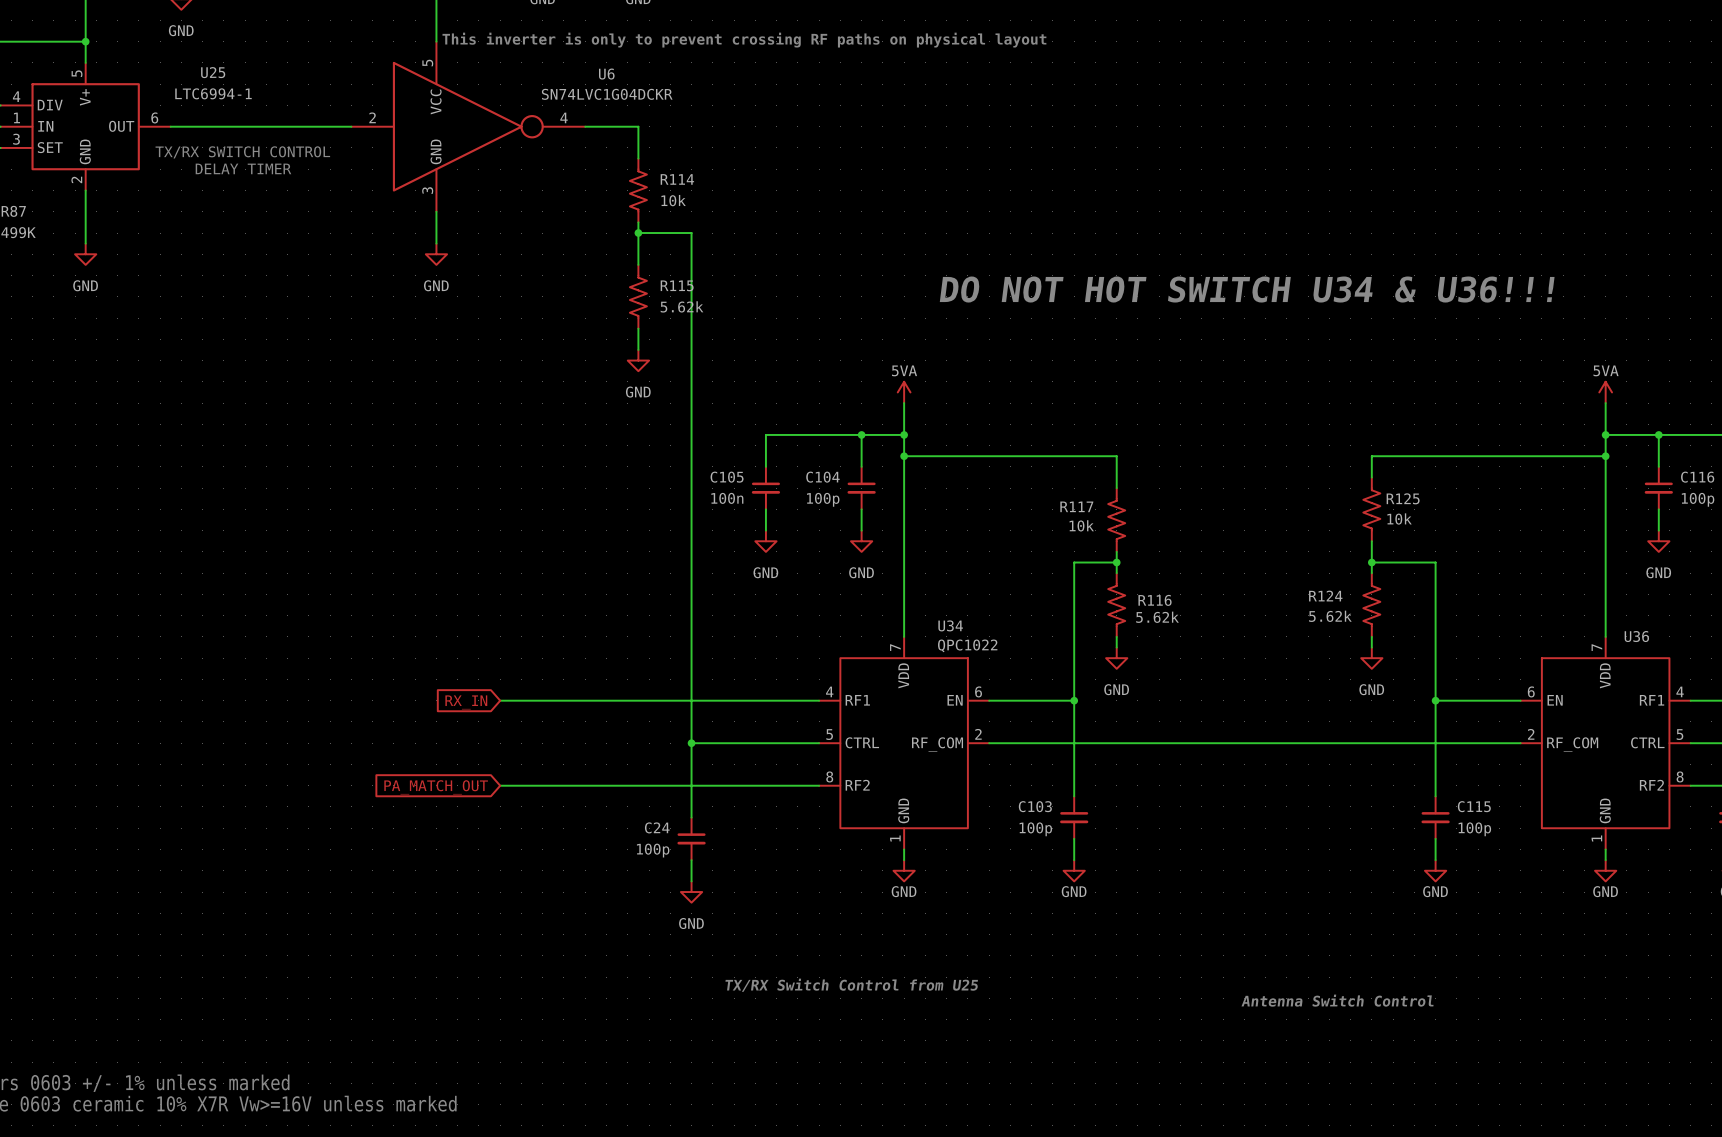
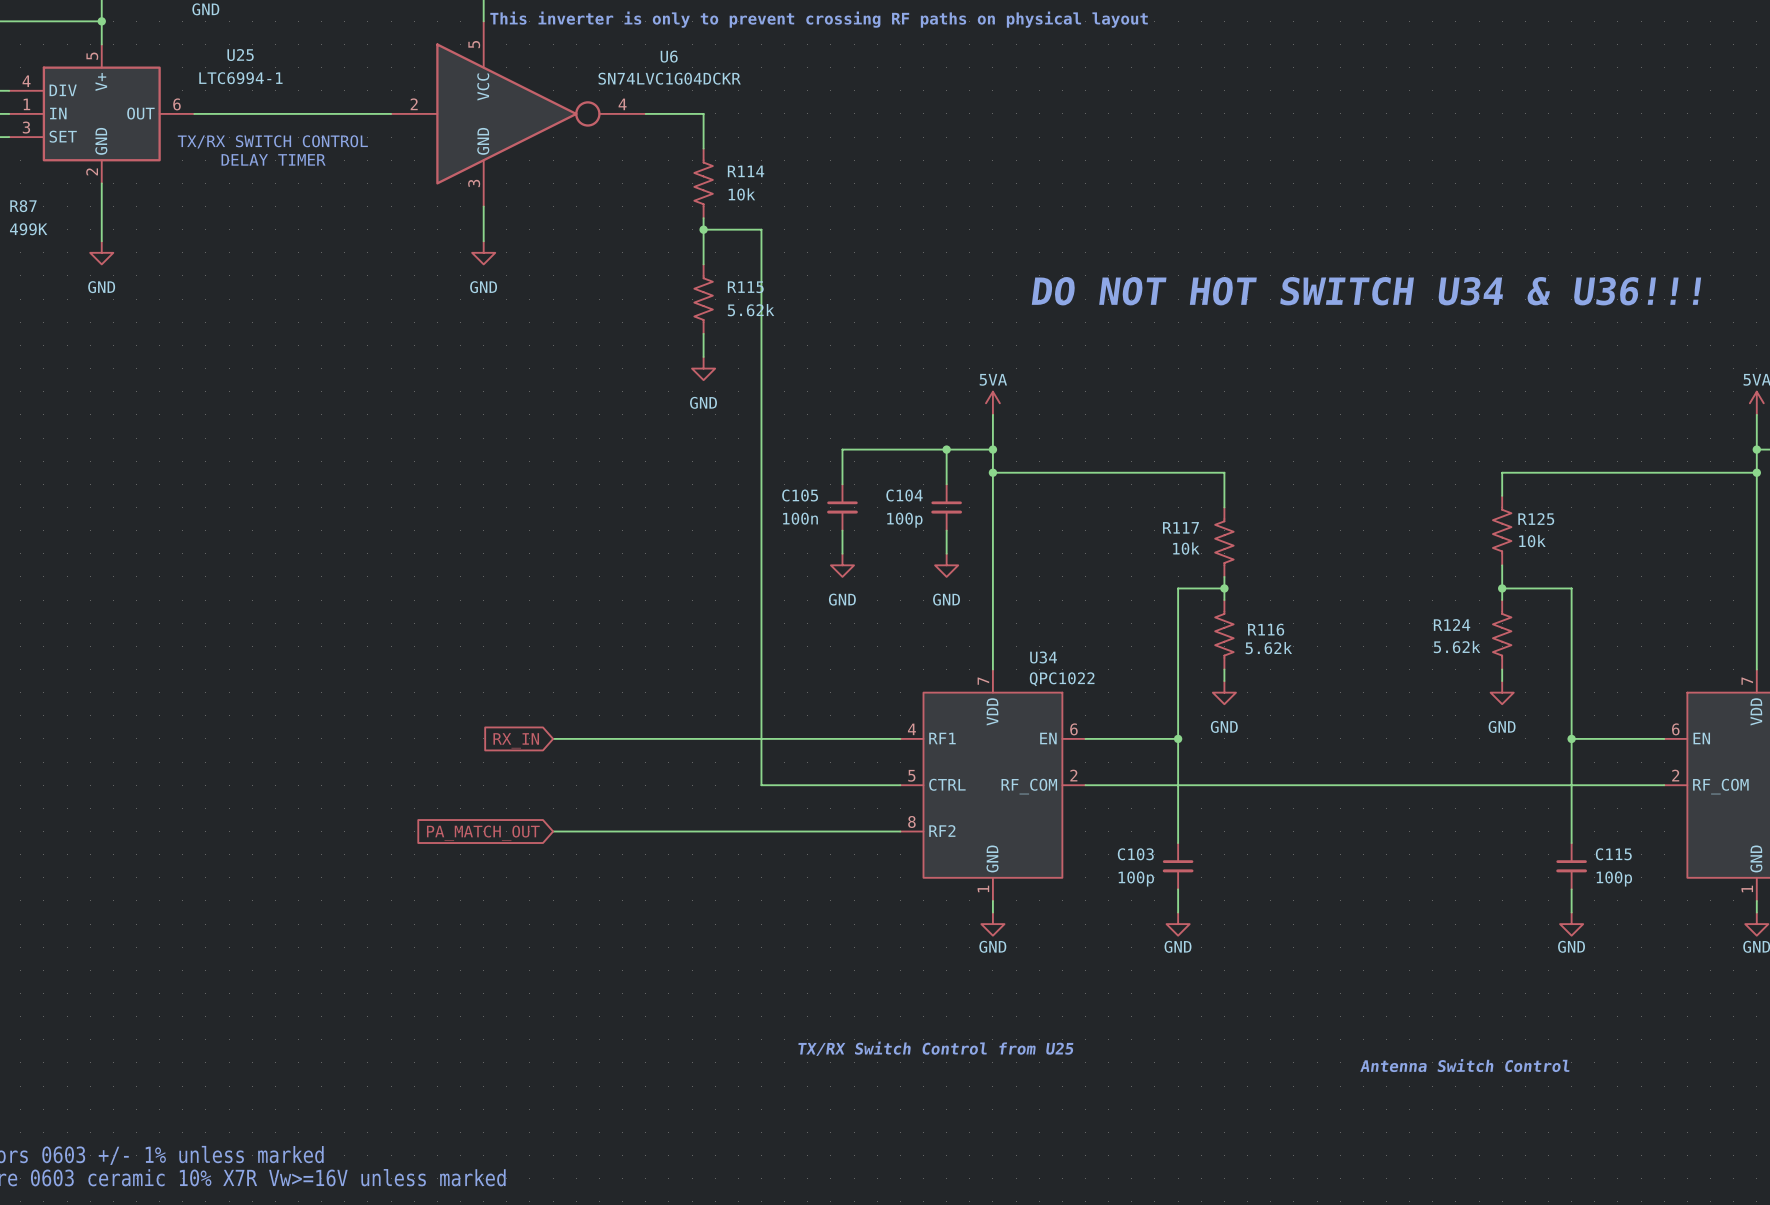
wire: (691, 743) (691, 817) -> none
junction: (691, 743) -> none
C24: 100p (691, 838) -> none
wire: (691, 860) (691, 881) -> none
power symbol: GND (691, 892) -> none

